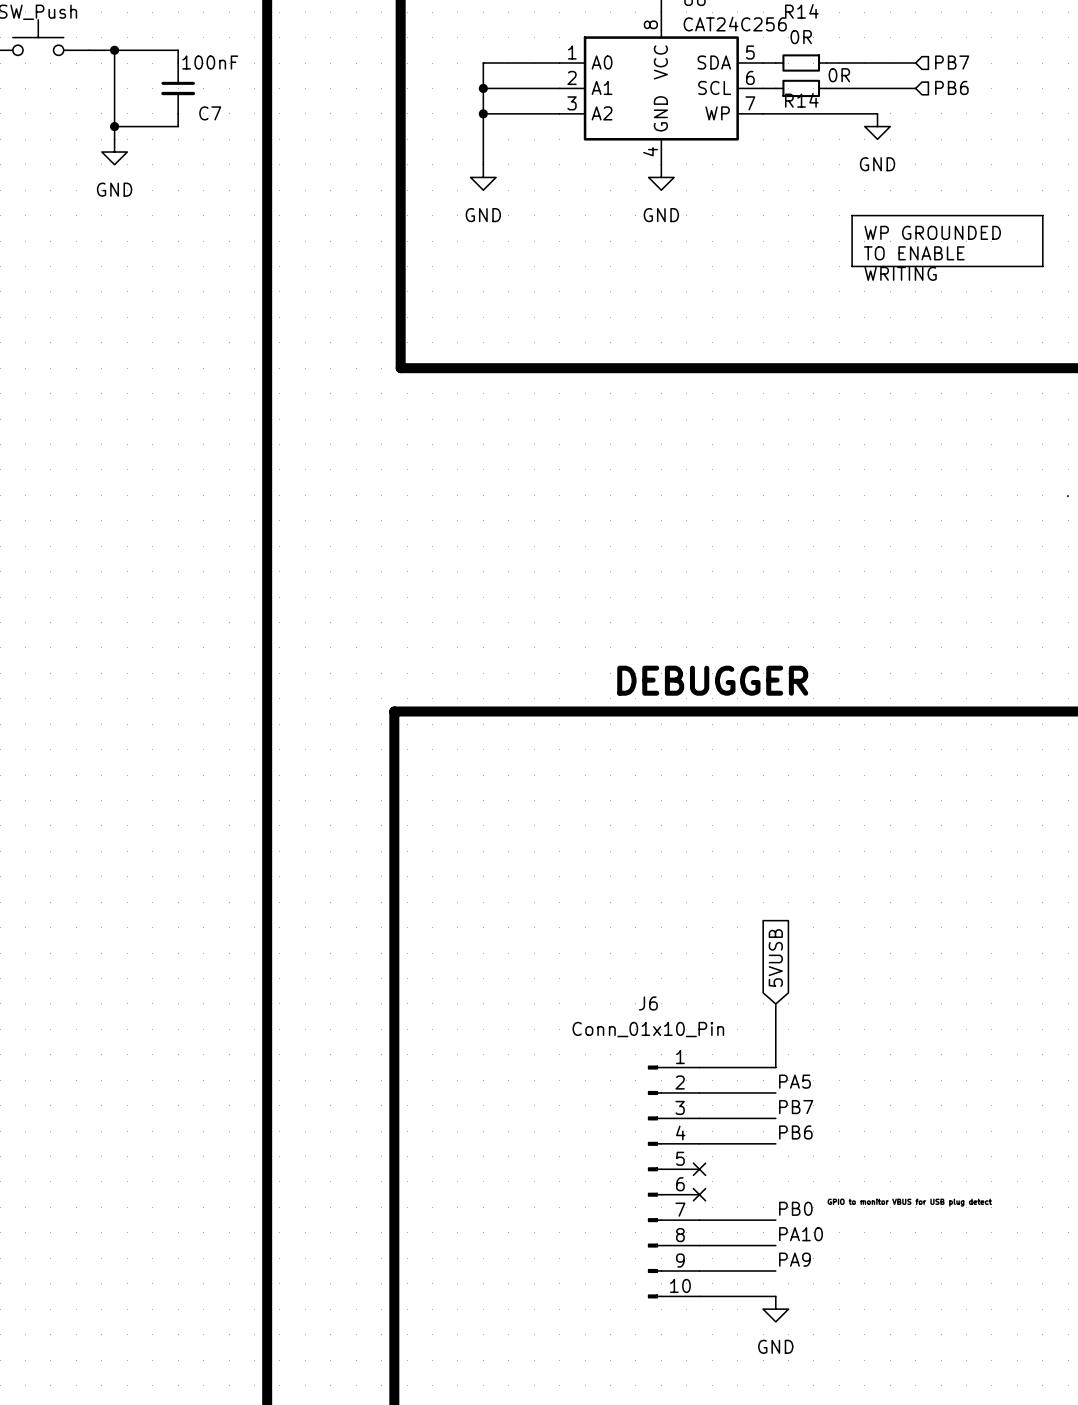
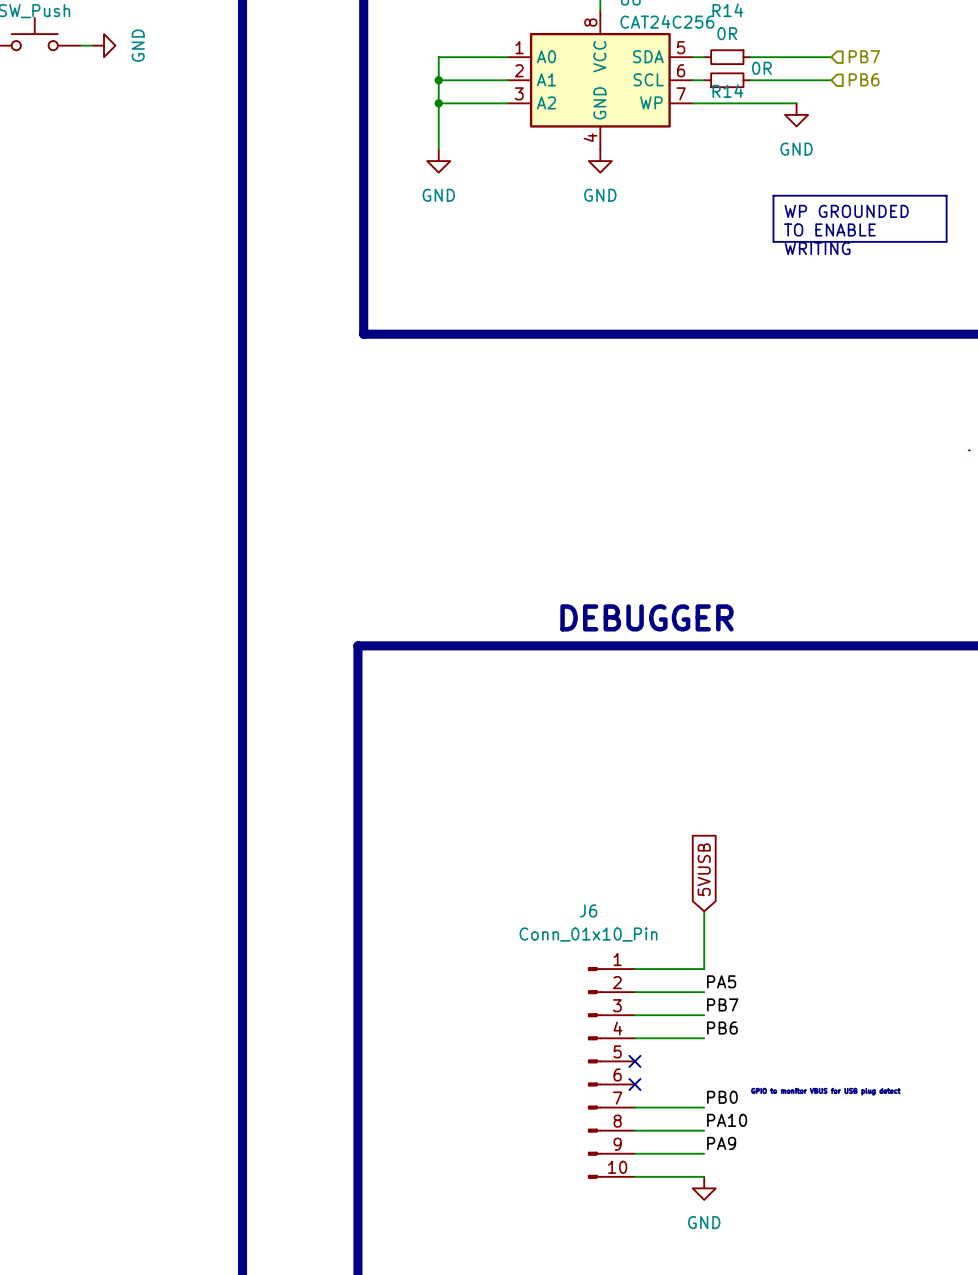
wire: (101, 50) (178, 50) (178, 63) -> none
wire: (114, 50) (114, 139) -> none
junction: (114, 50) -> none
C7: 100nF (178, 88) -> none
wire: (178, 113) (178, 126) (114, 126) -> none
junction: (114, 126) -> none
power symbol rotation: 0° (114, 152) -> 90° counterclockwise (104, 45)
power symbol position: GND (114, 152) -> GND (104, 45)

